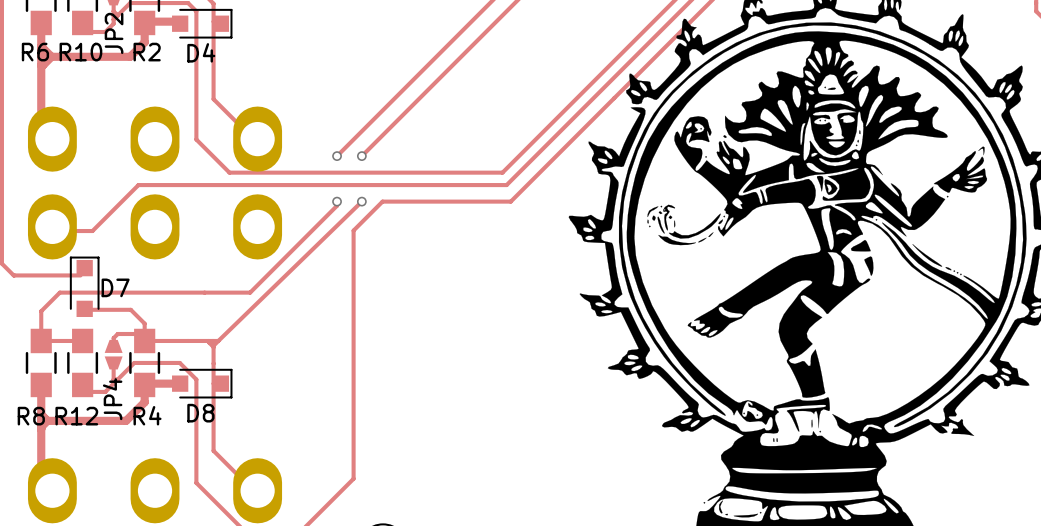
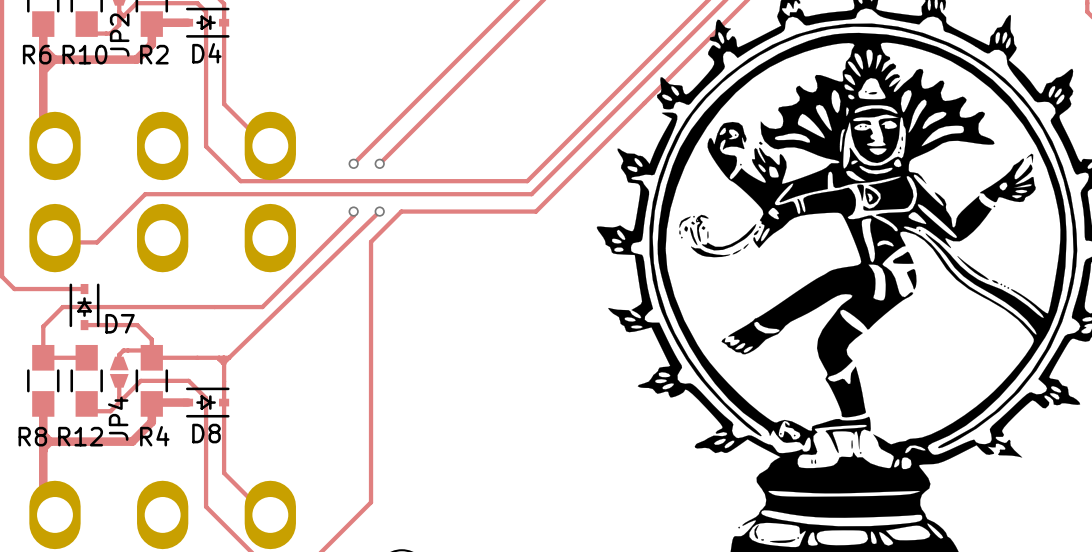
D4 footprint: [172, 8, 233, 39] -> [183, 7, 230, 38]
D7 footprint: [69, 256, 100, 317] -> [69, 283, 100, 331]
D8 footprint: [172, 368, 233, 399] -> [183, 387, 230, 418]

